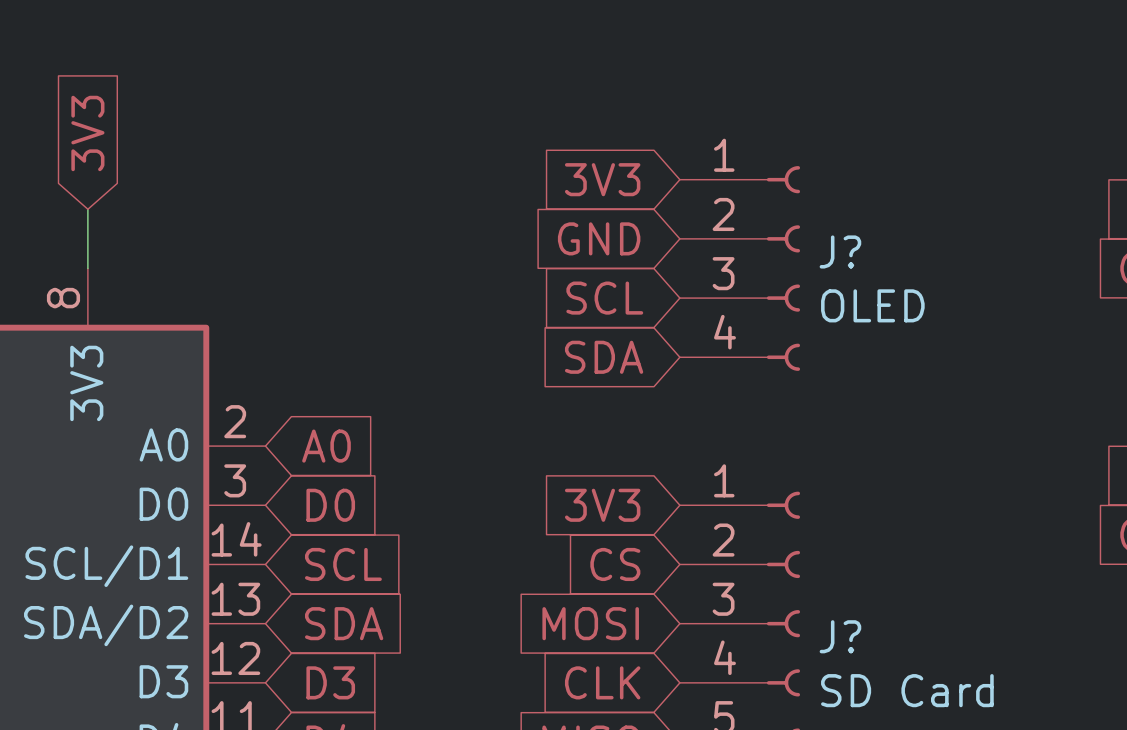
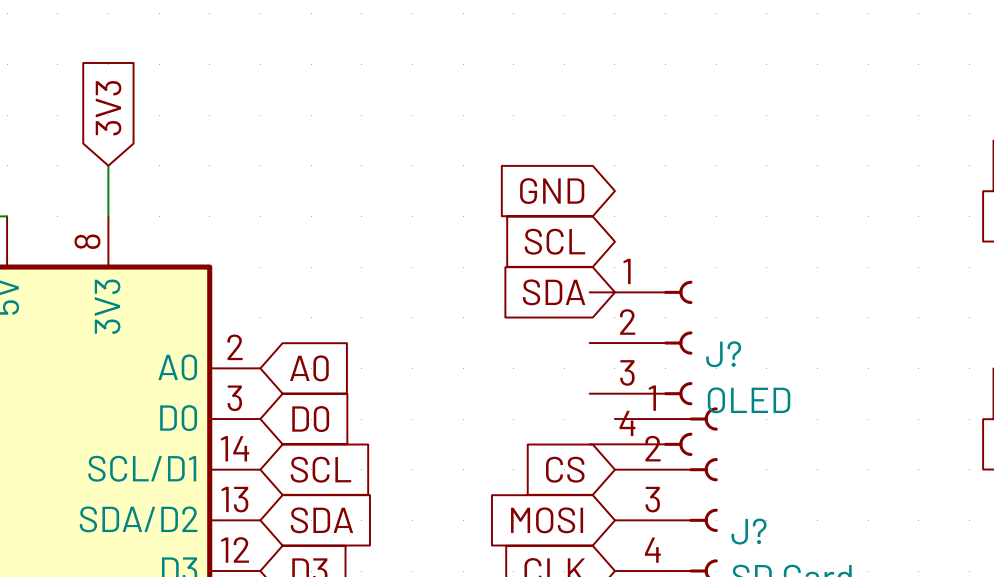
global label: 3V3 (602, 179) -> none
J? position: (739, 268) -> (641, 368)
global label: 3V3 (602, 505) -> none

